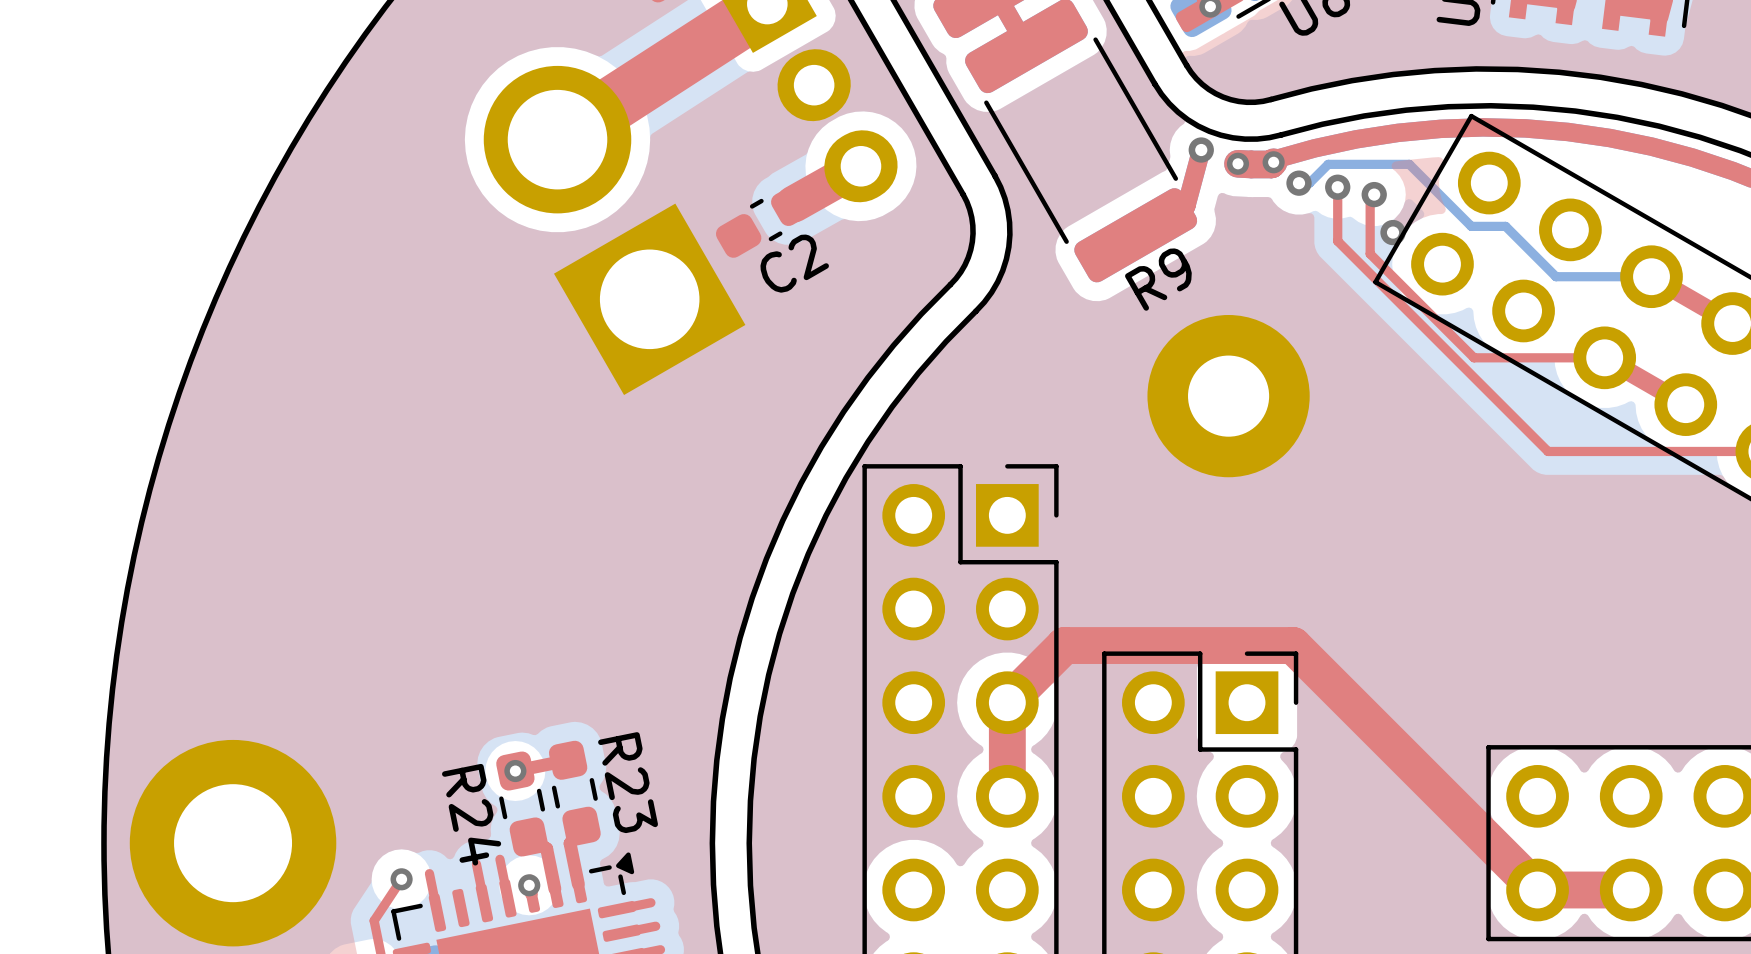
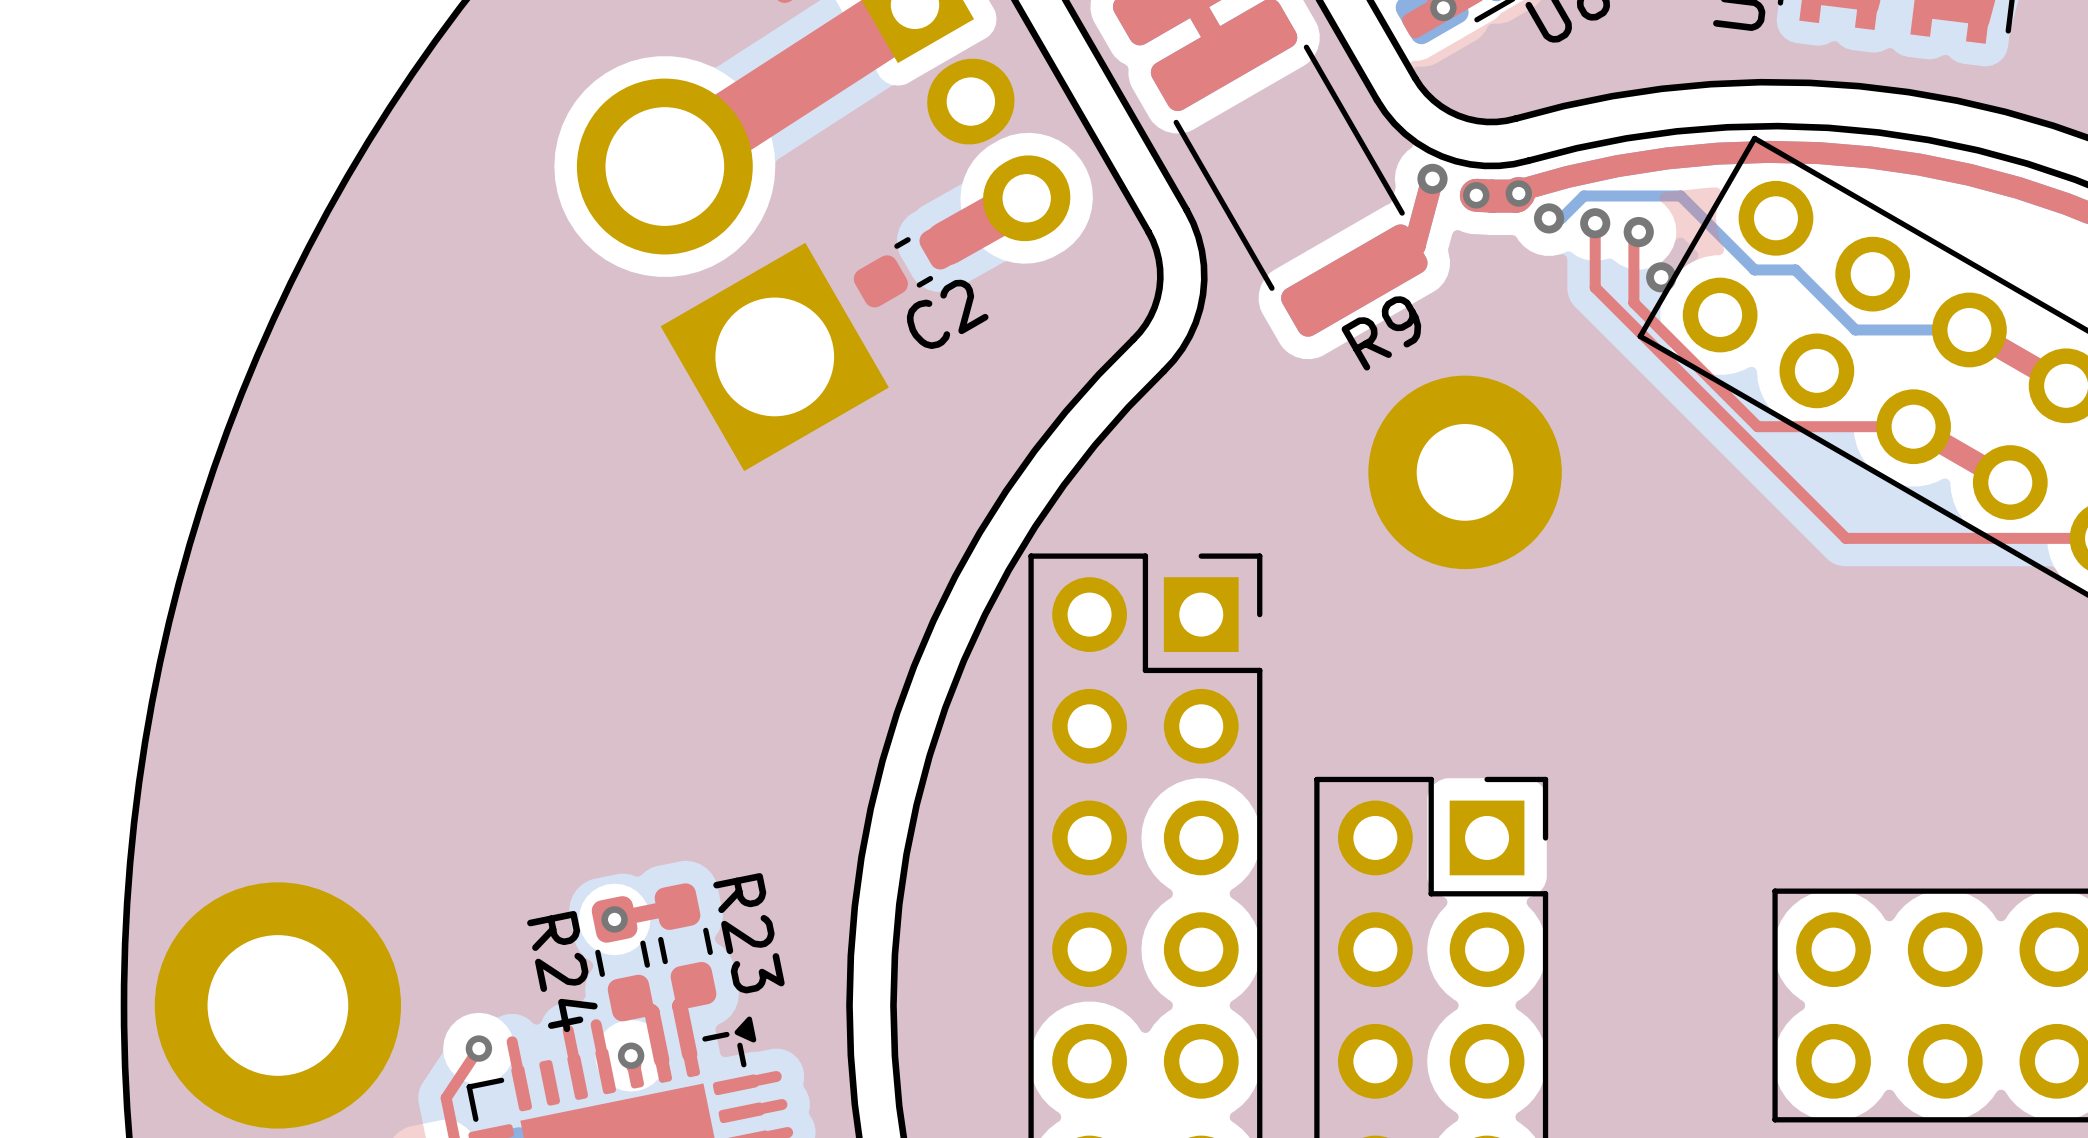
top track: (1007, 796) (1007, 702) (1064, 645) (1293, 645) (1537, 890) (1631, 890) -> none

